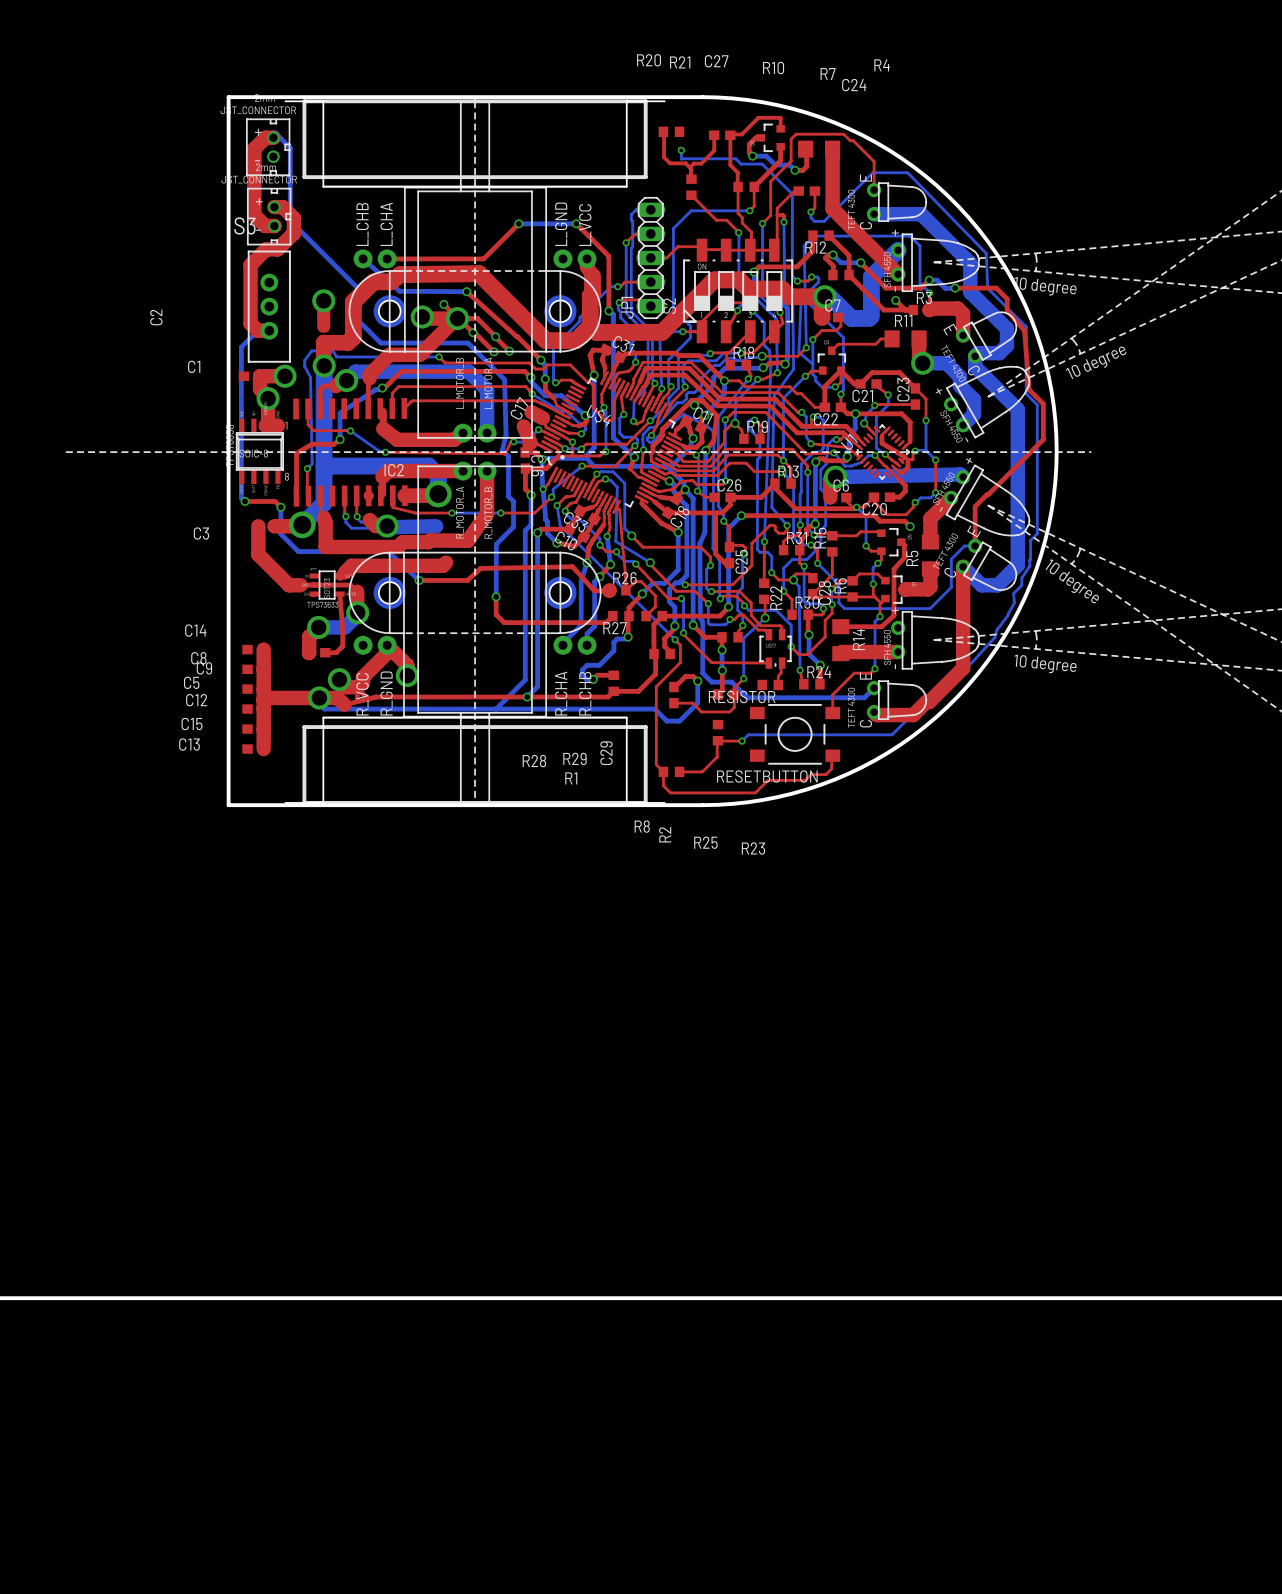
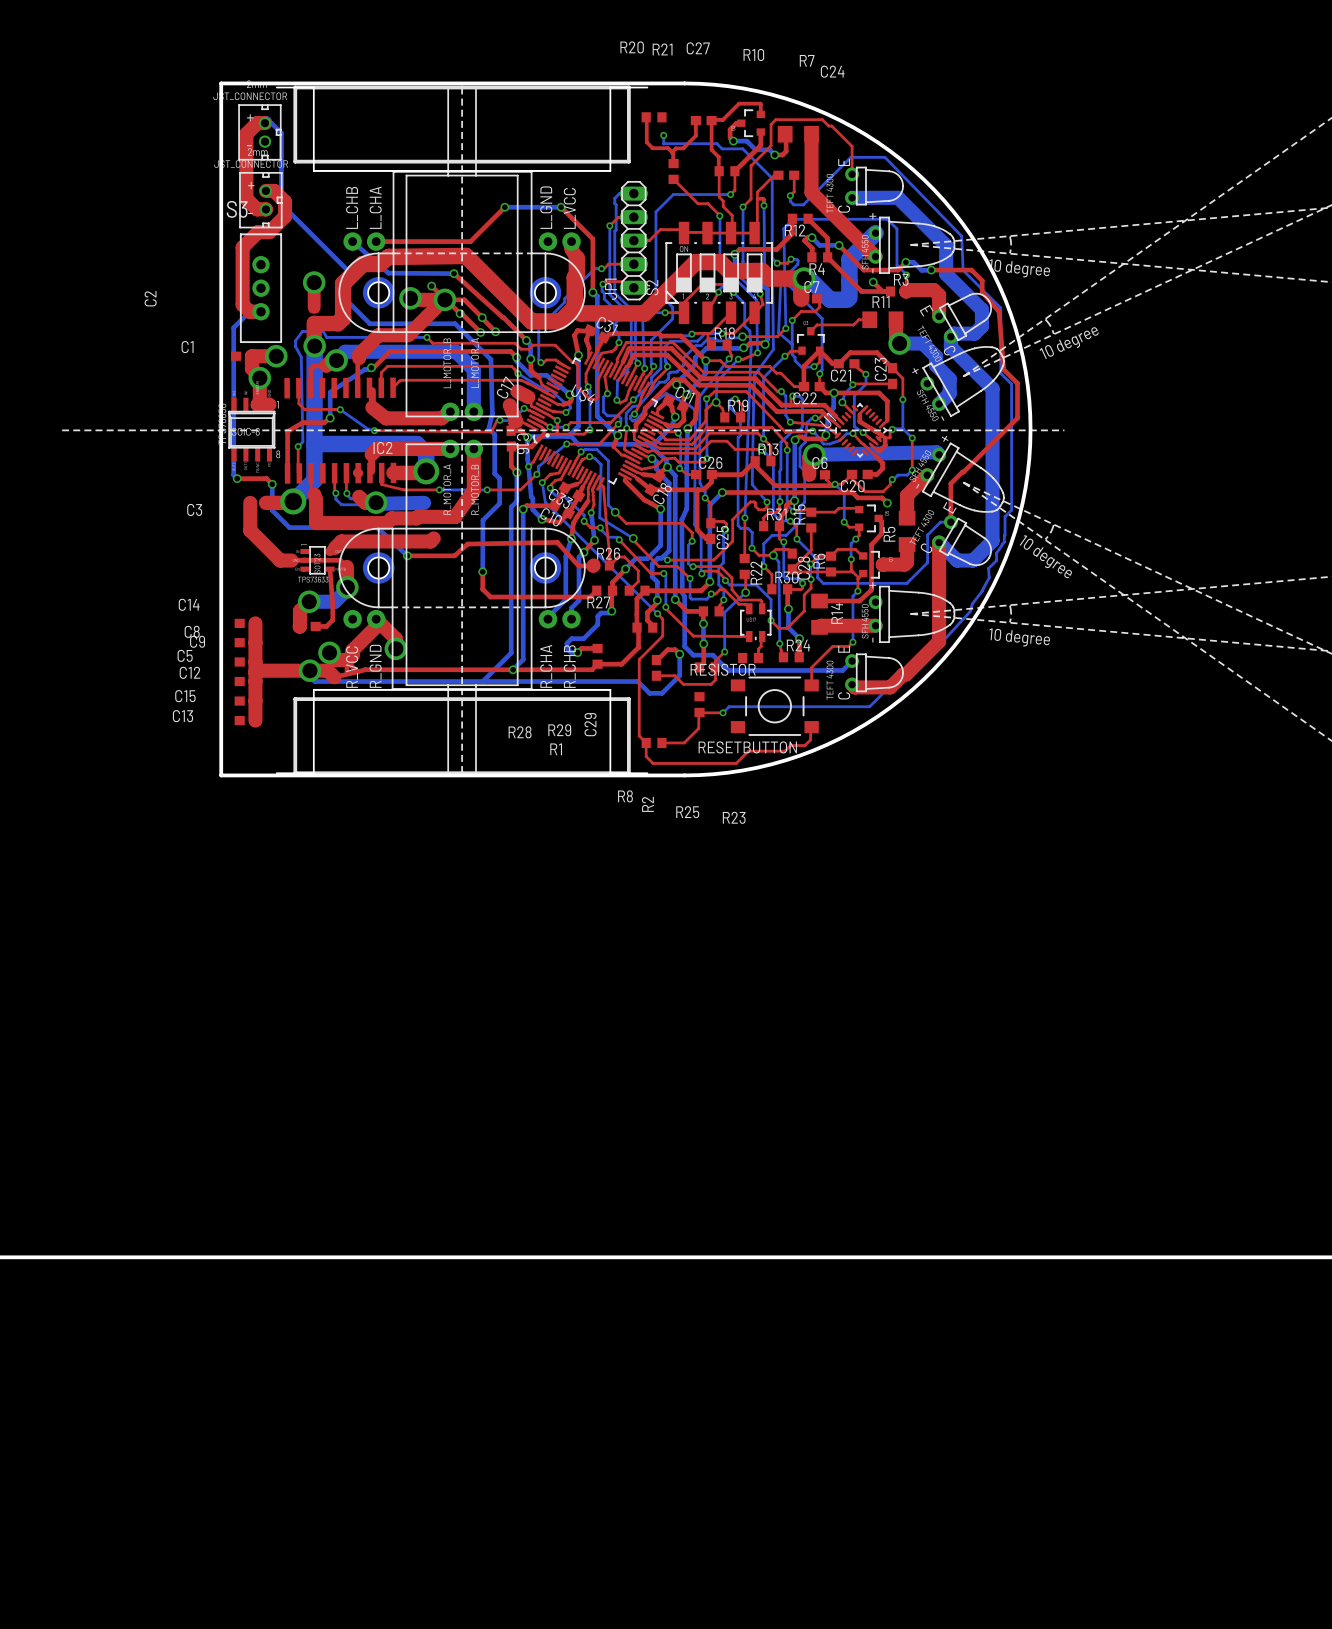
R4 name position: R4 (882, 65) -> R4 (817, 269)

